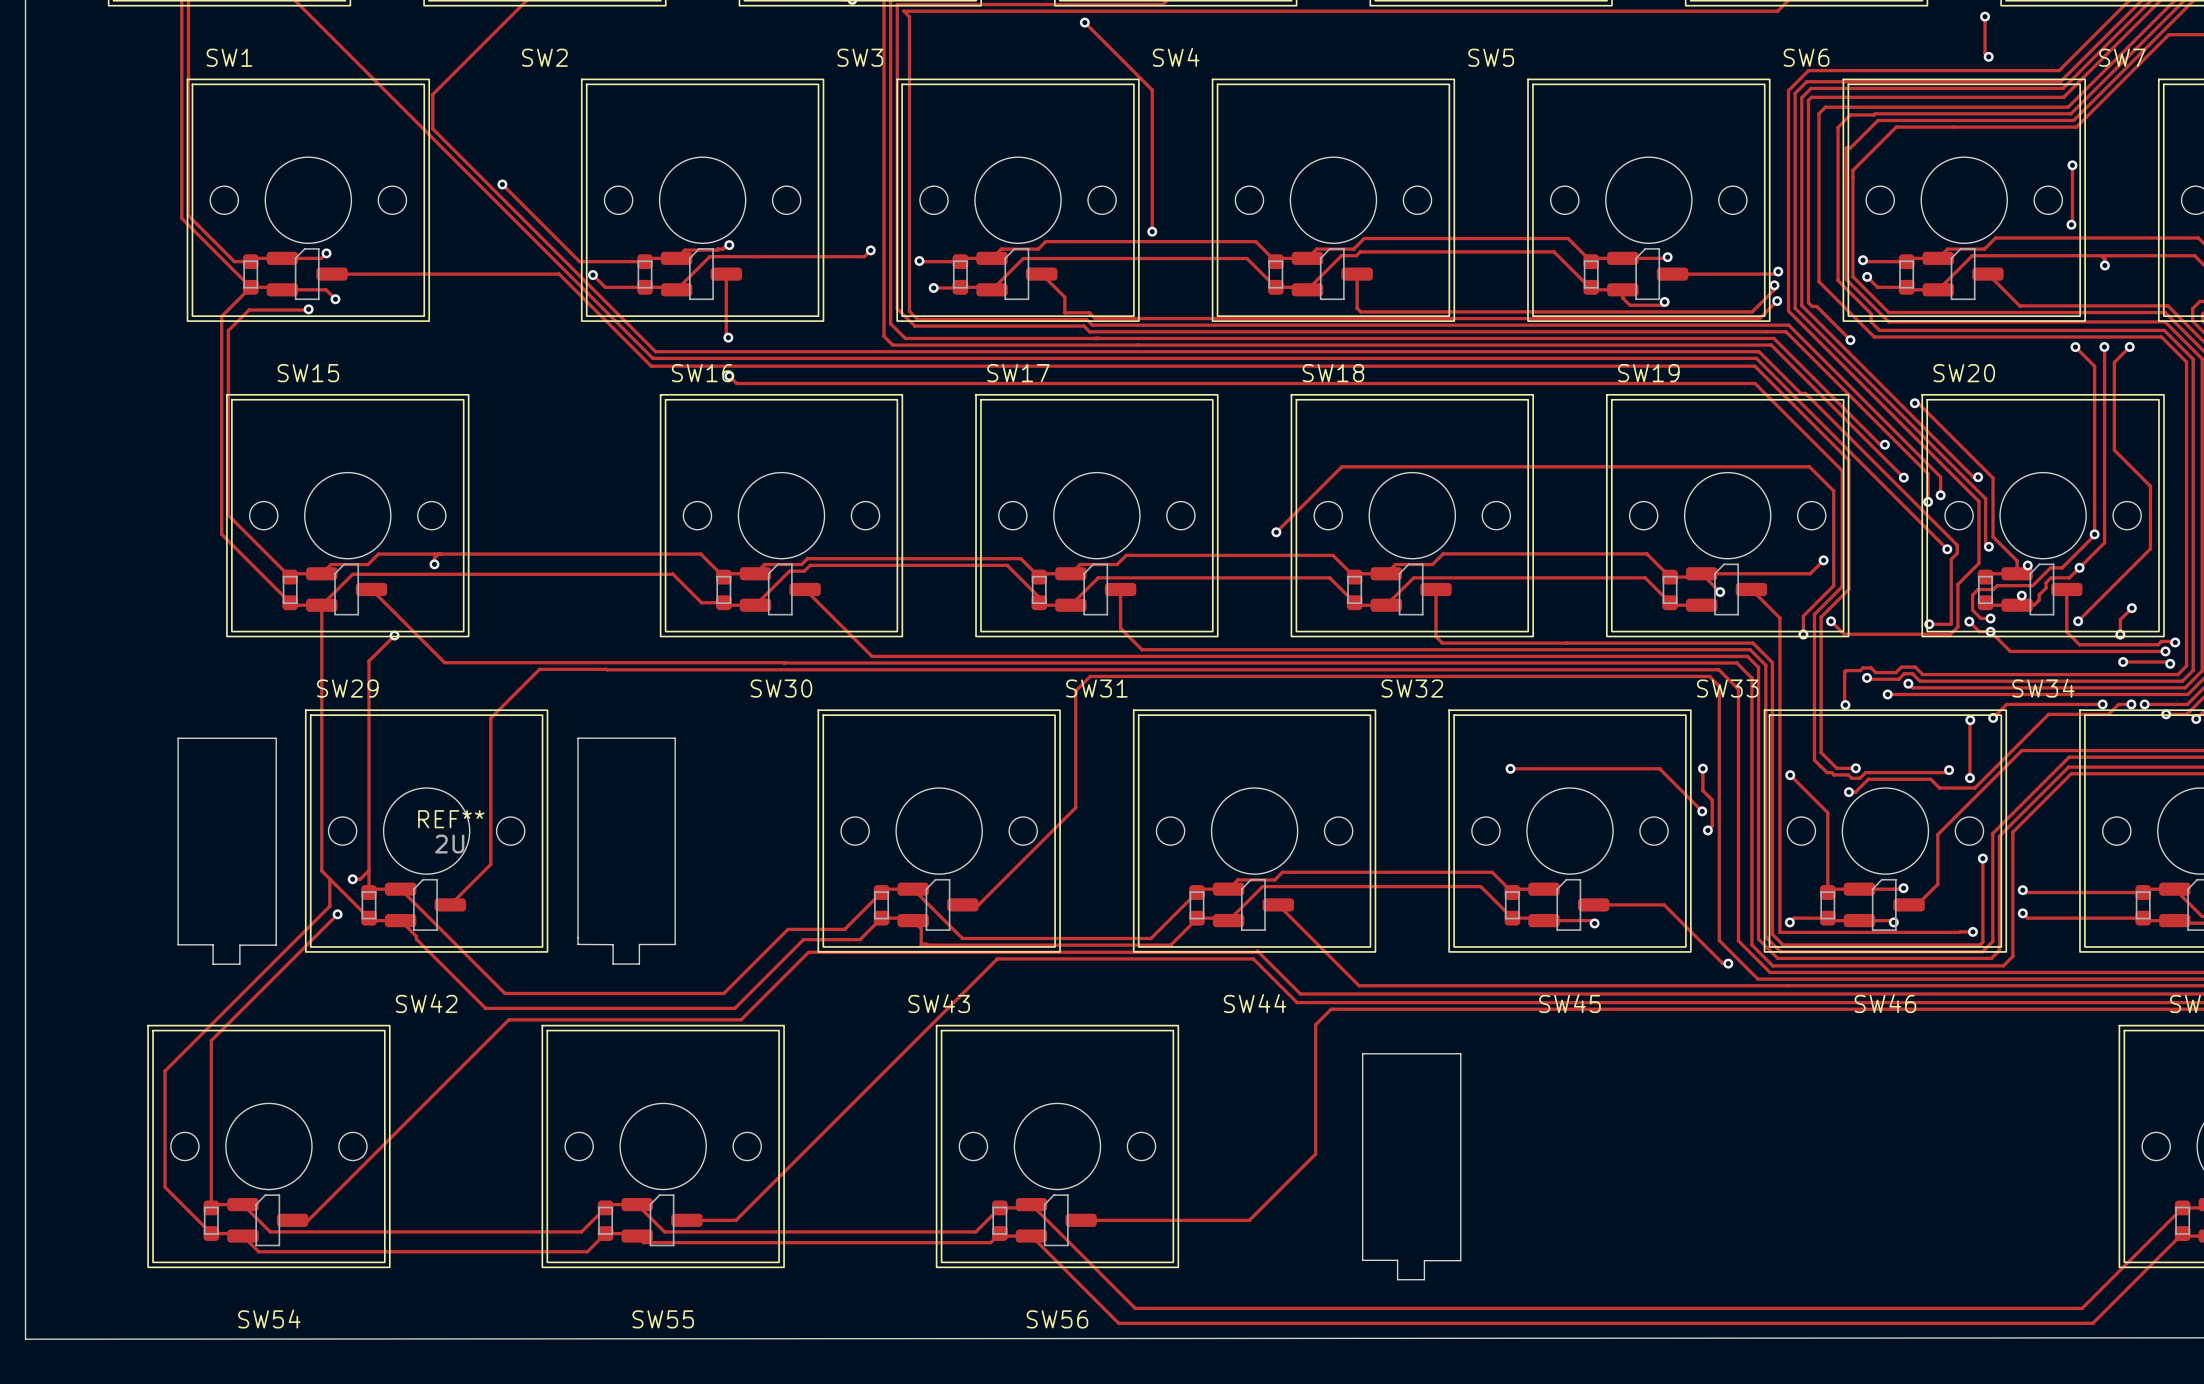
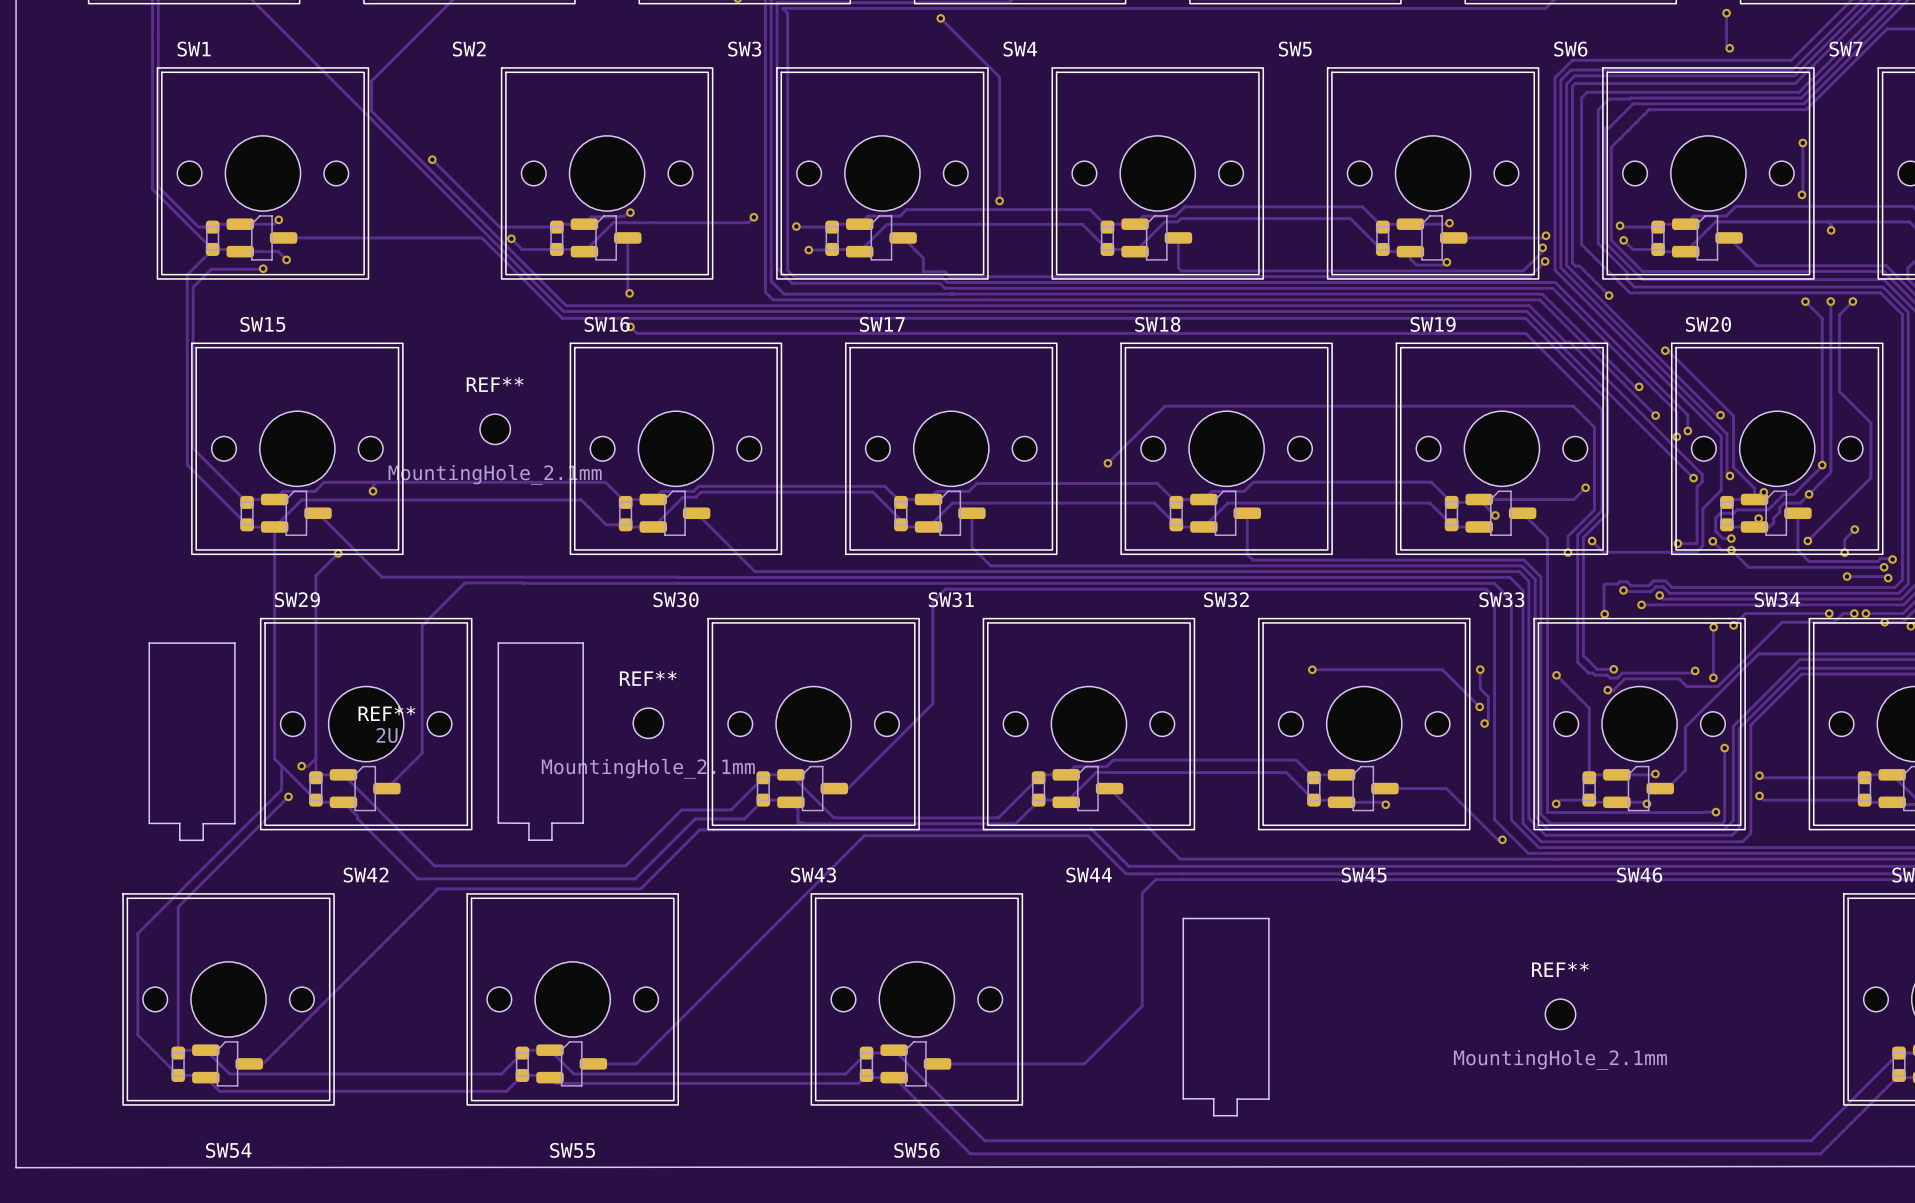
REF**: none -> MountingHole_2.1mm (495, 429)
REF**: none -> MountingHole_2.1mm (648, 723)
REF**: none -> MountingHole_2.1mm (1560, 1014)

